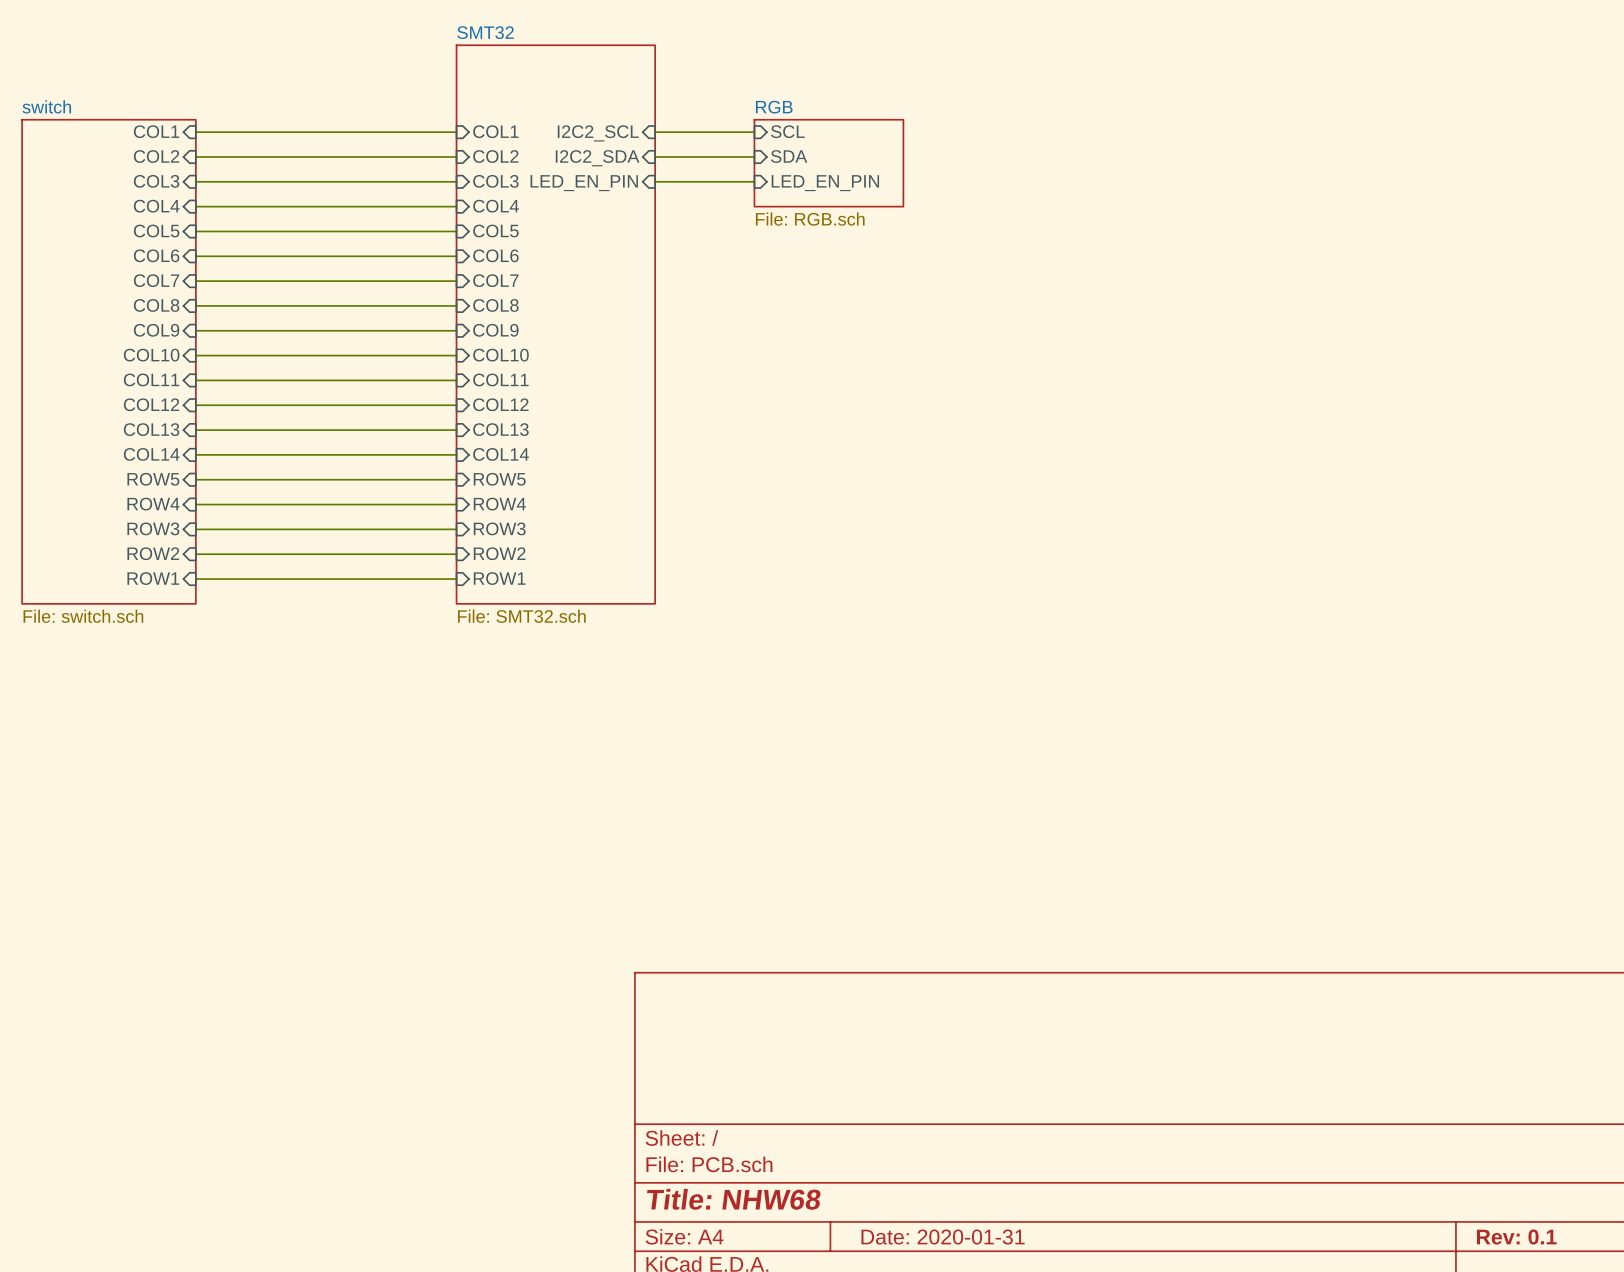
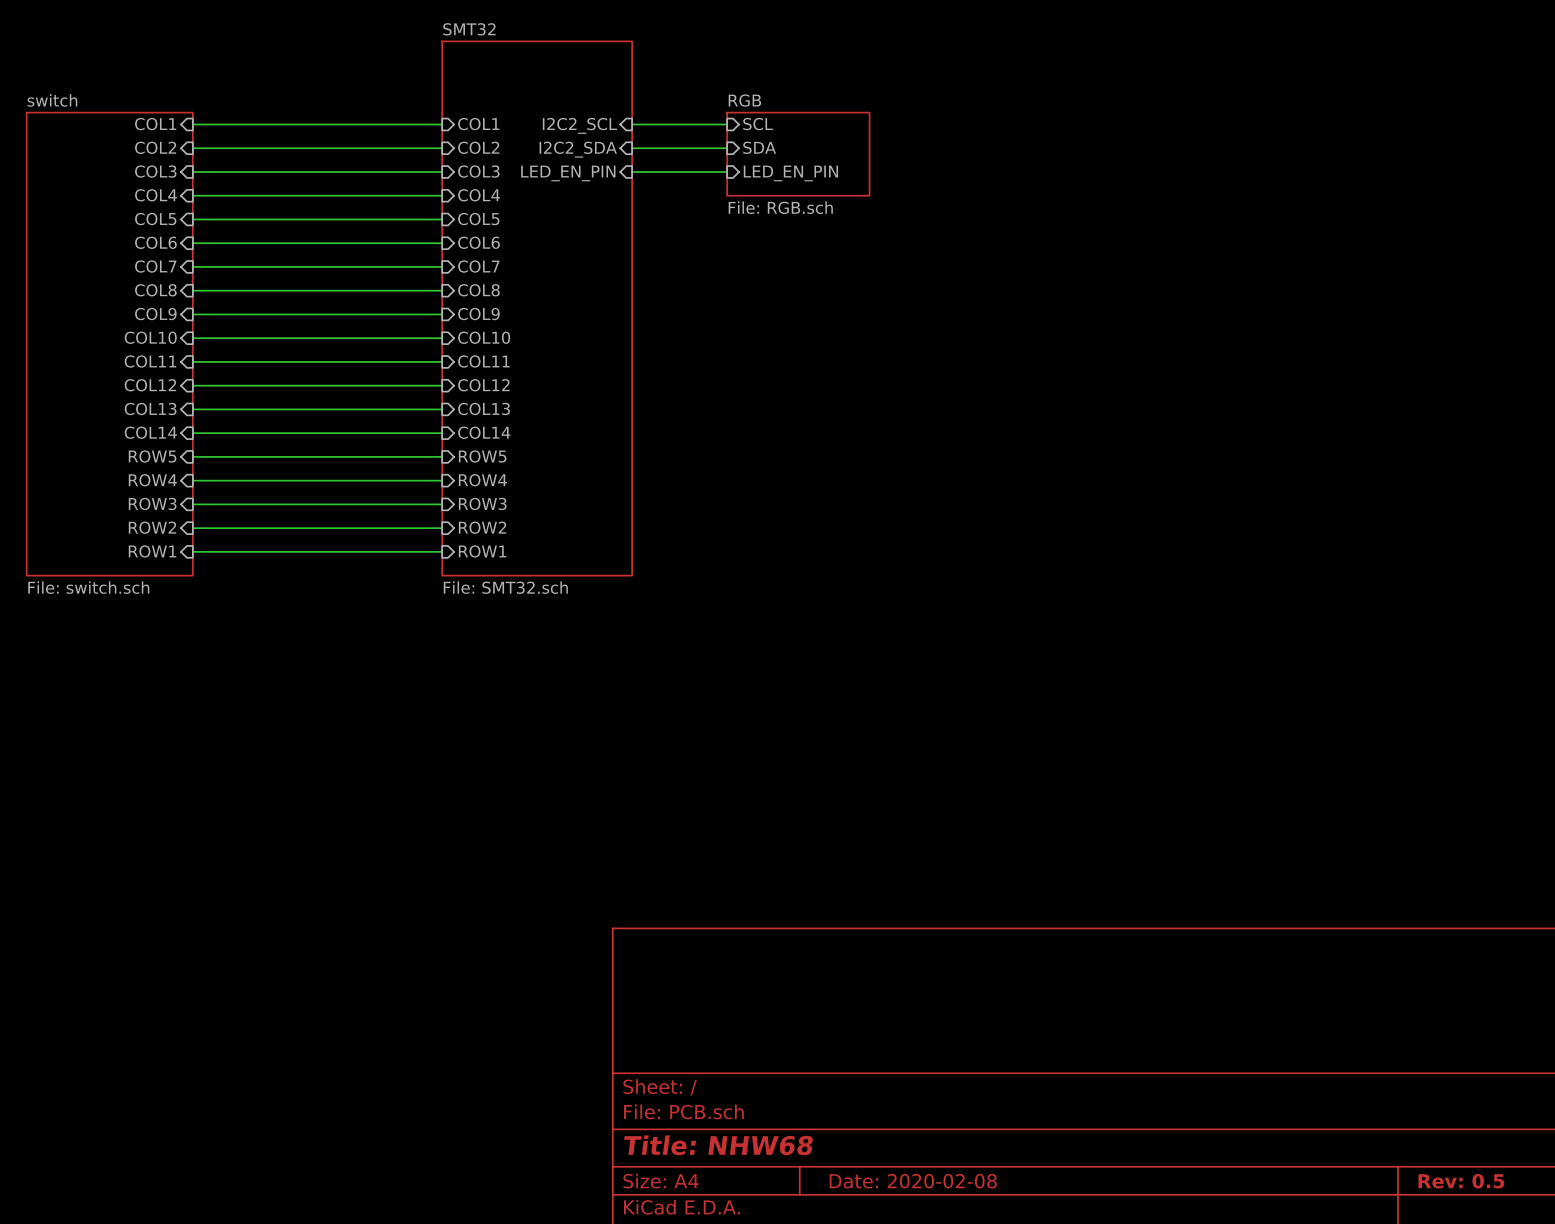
title block: Date: 2020-01-31 (943, 1237) -> Date: 2020-02-08 (913, 1181)
title block: Rev: 0.1 (1516, 1237) -> Rev: 0.5 (1461, 1181)

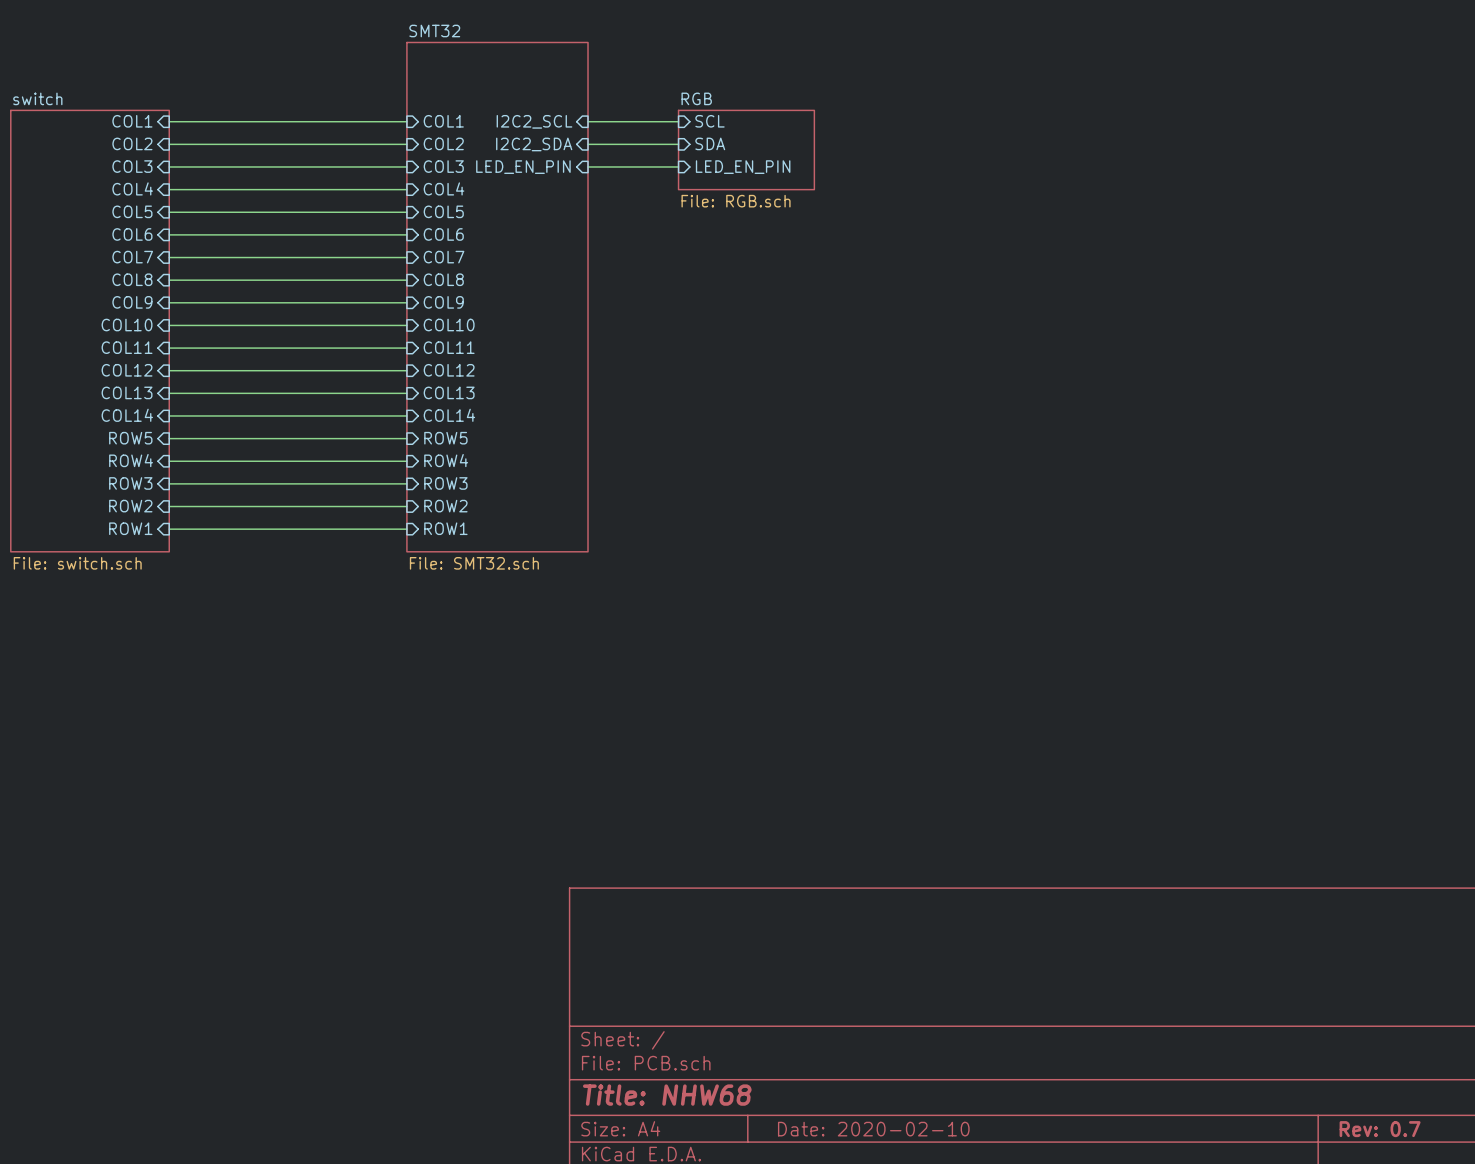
title block: Date: 2020-02-08 (913, 1181) -> Date: 2020-02-10 (873, 1129)
title block: Rev: 0.5 (1461, 1181) -> Rev: 0.7 (1380, 1129)

